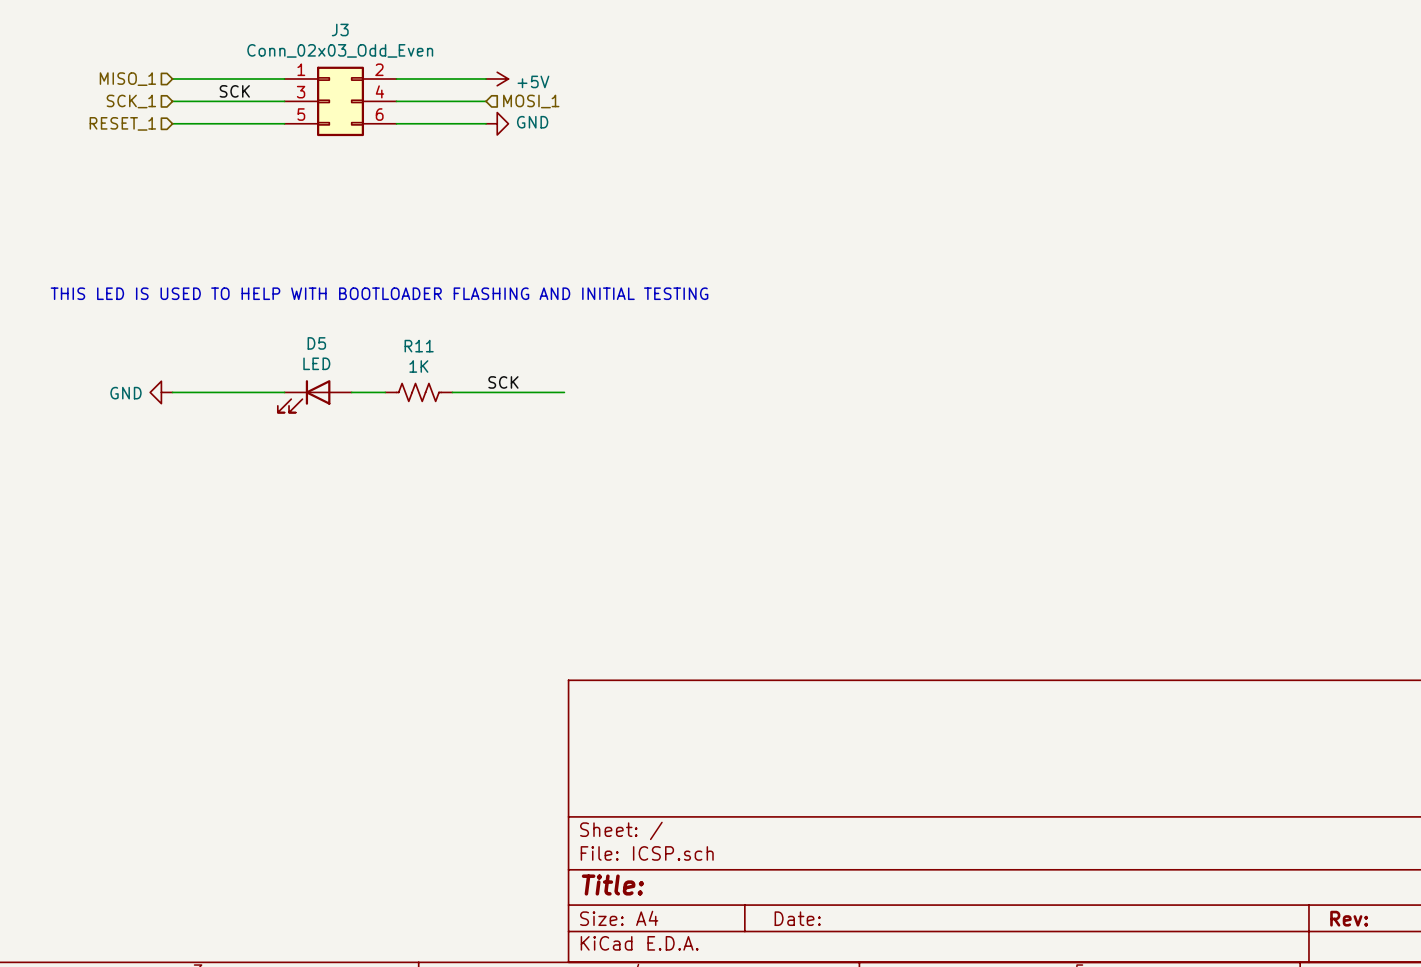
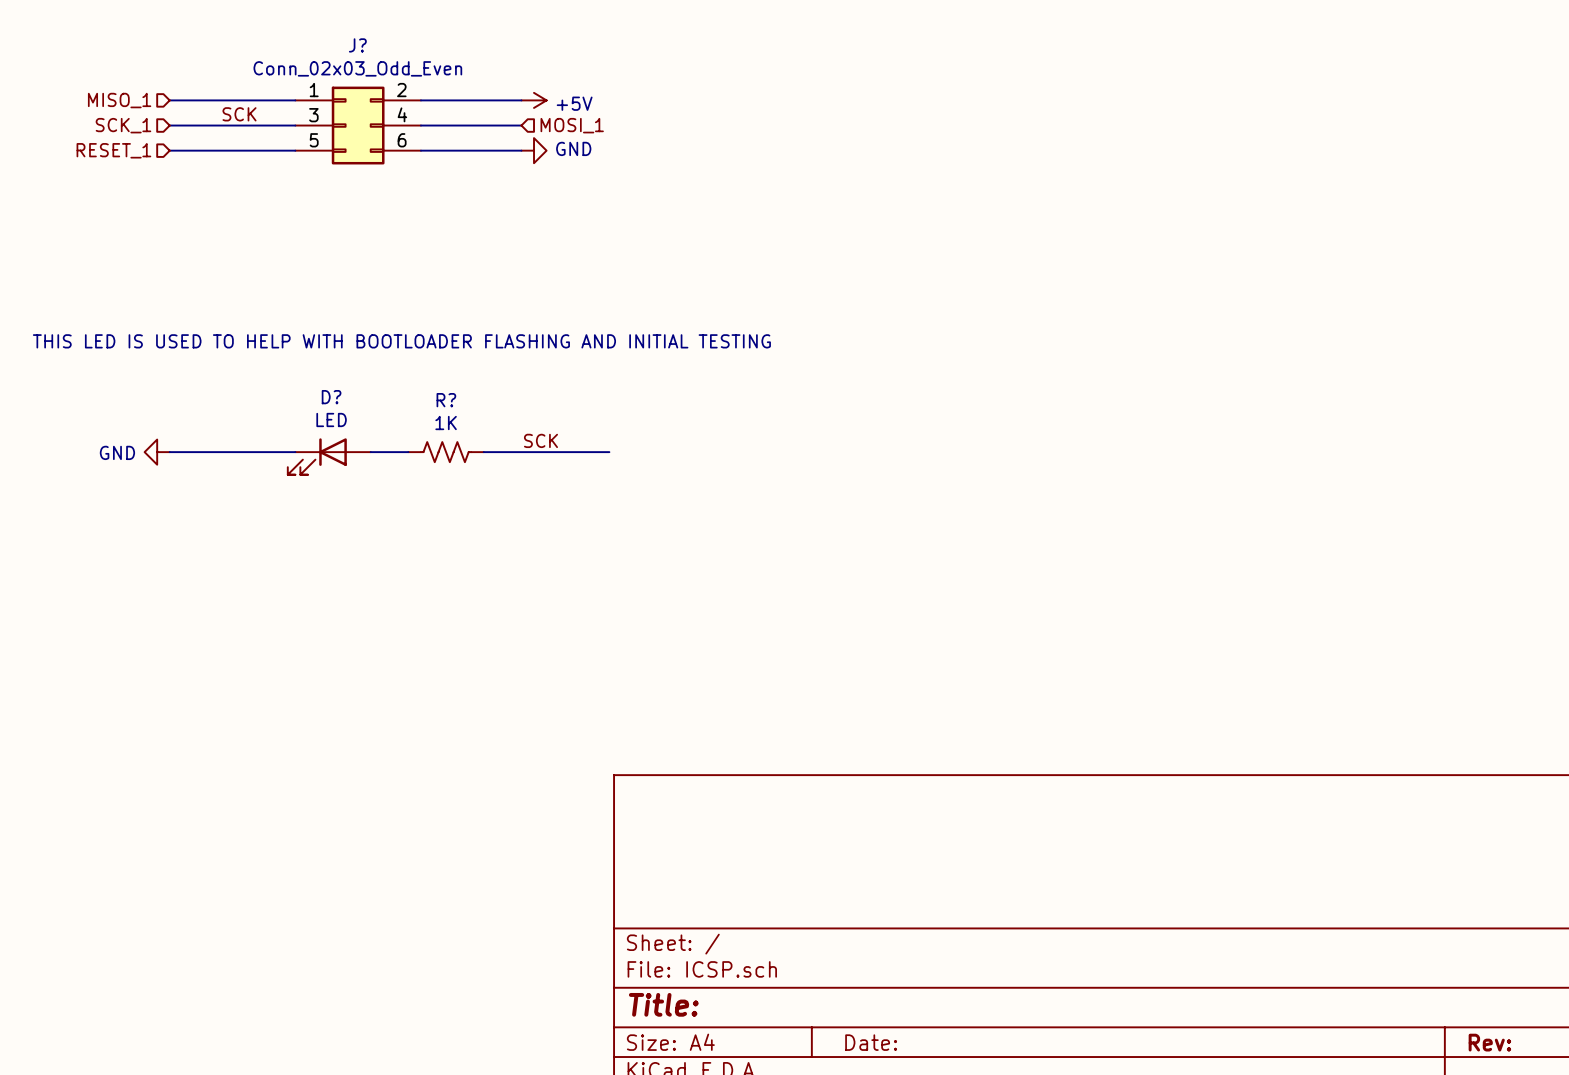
J3 name: J3 (340, 29) -> J? (357, 45)
D5 name: D5 (316, 343) -> D? (331, 397)
R11 name: R11 (419, 346) -> R? (446, 400)

